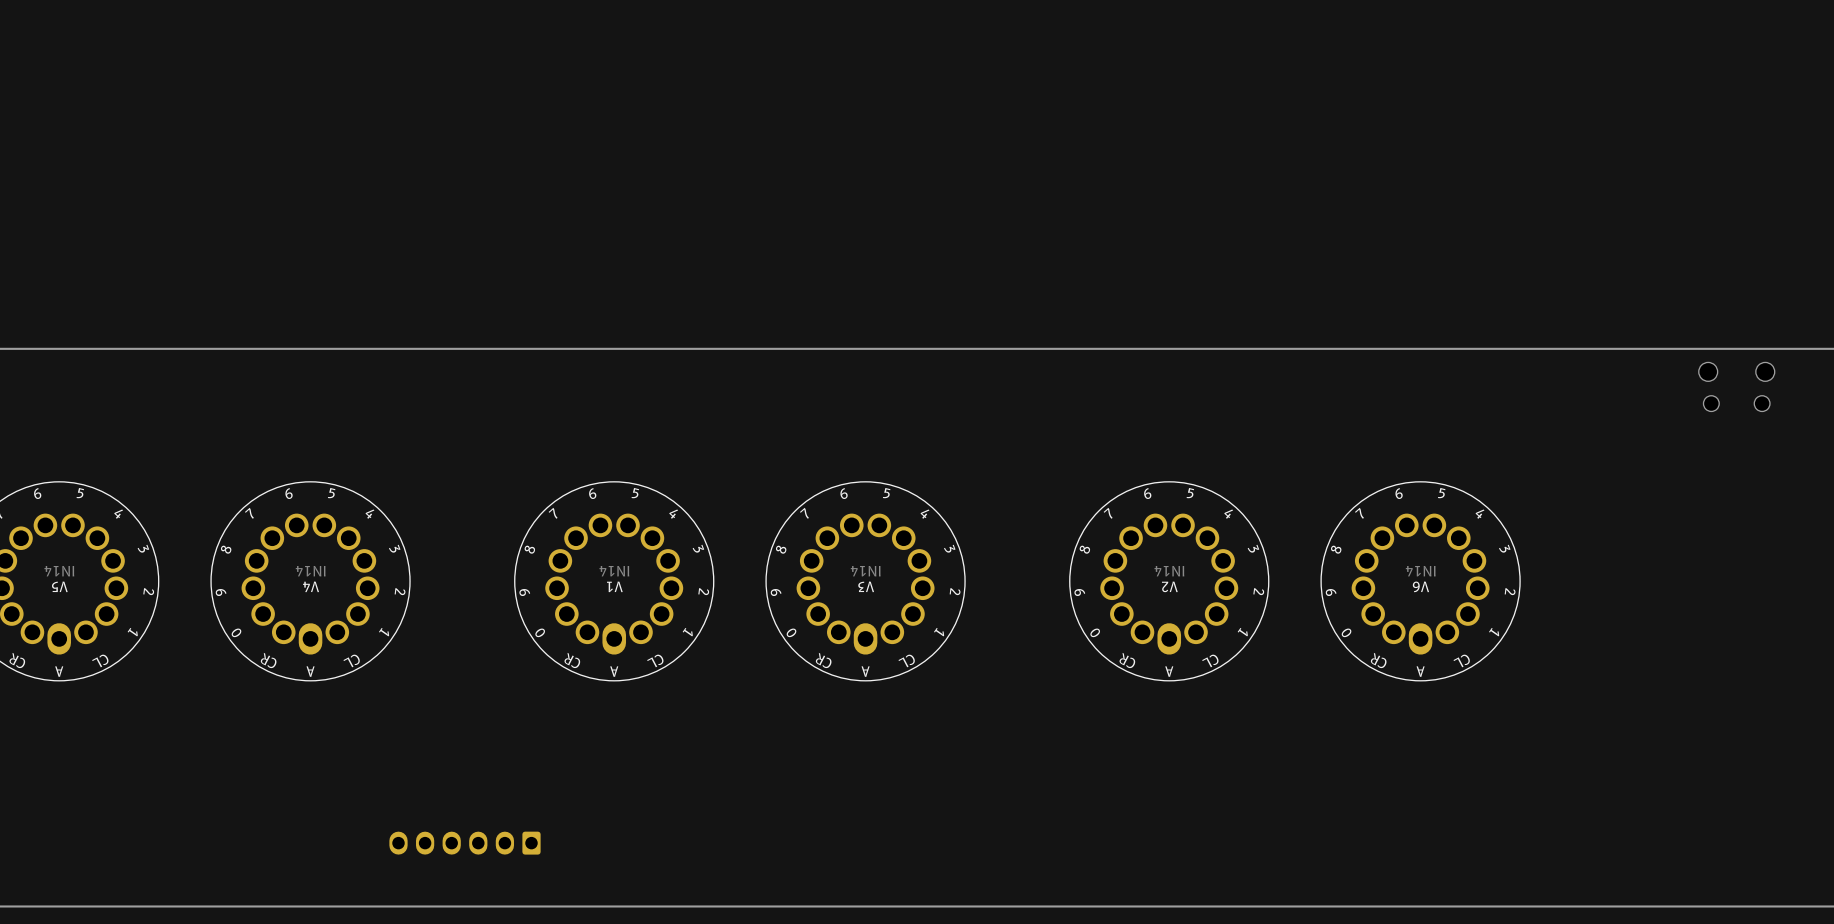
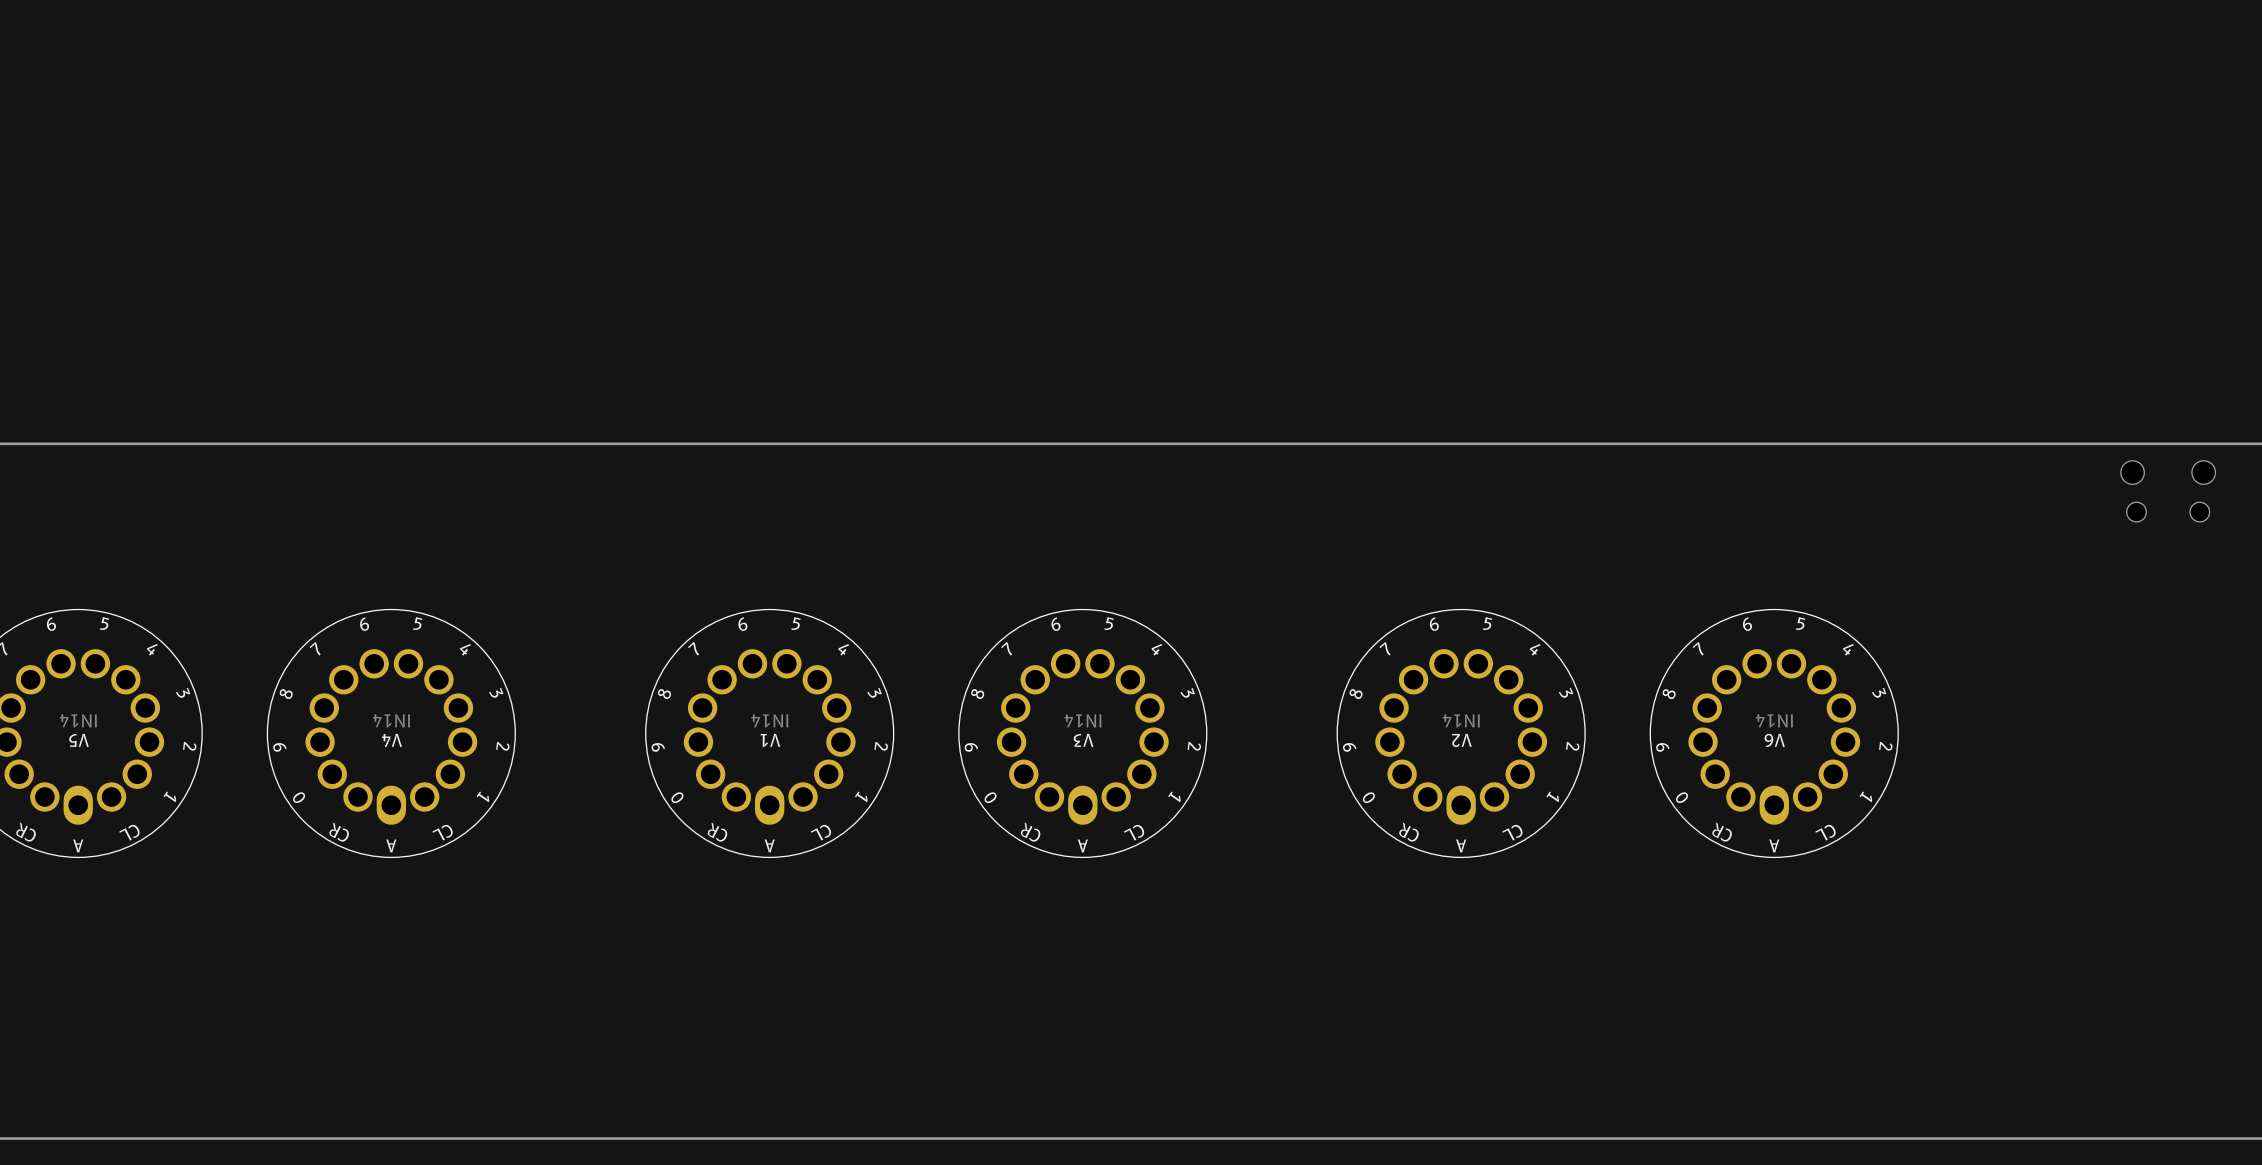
part: (465, 843) -> none

